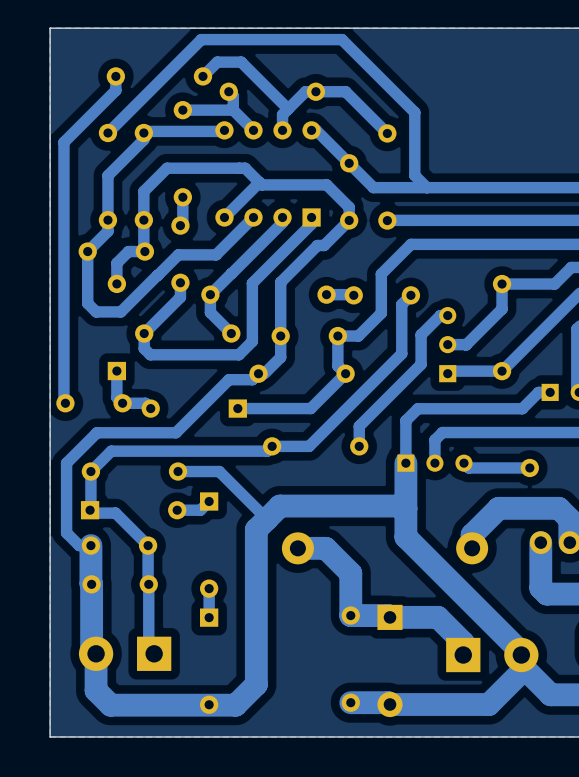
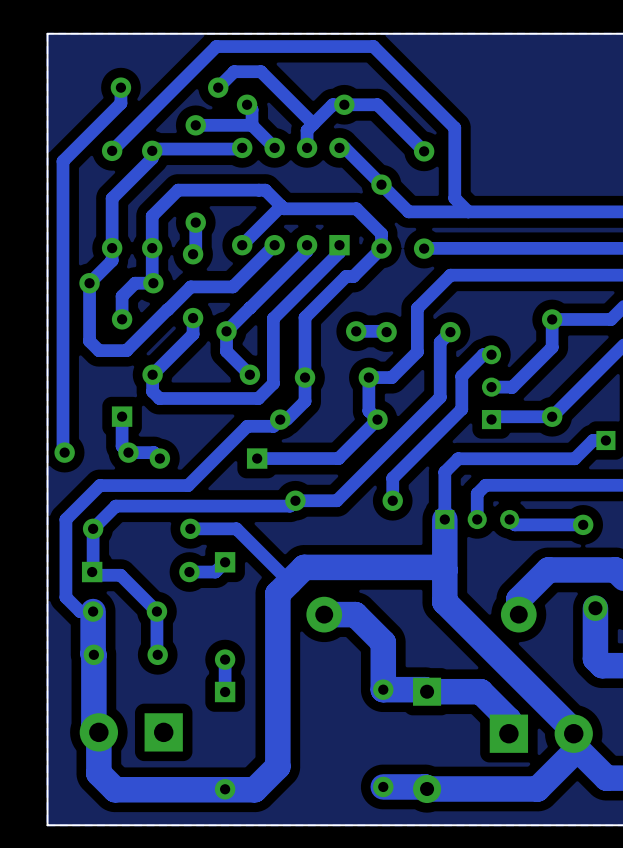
bottom track: (148, 584) (148, 648) (154, 653) -> none

